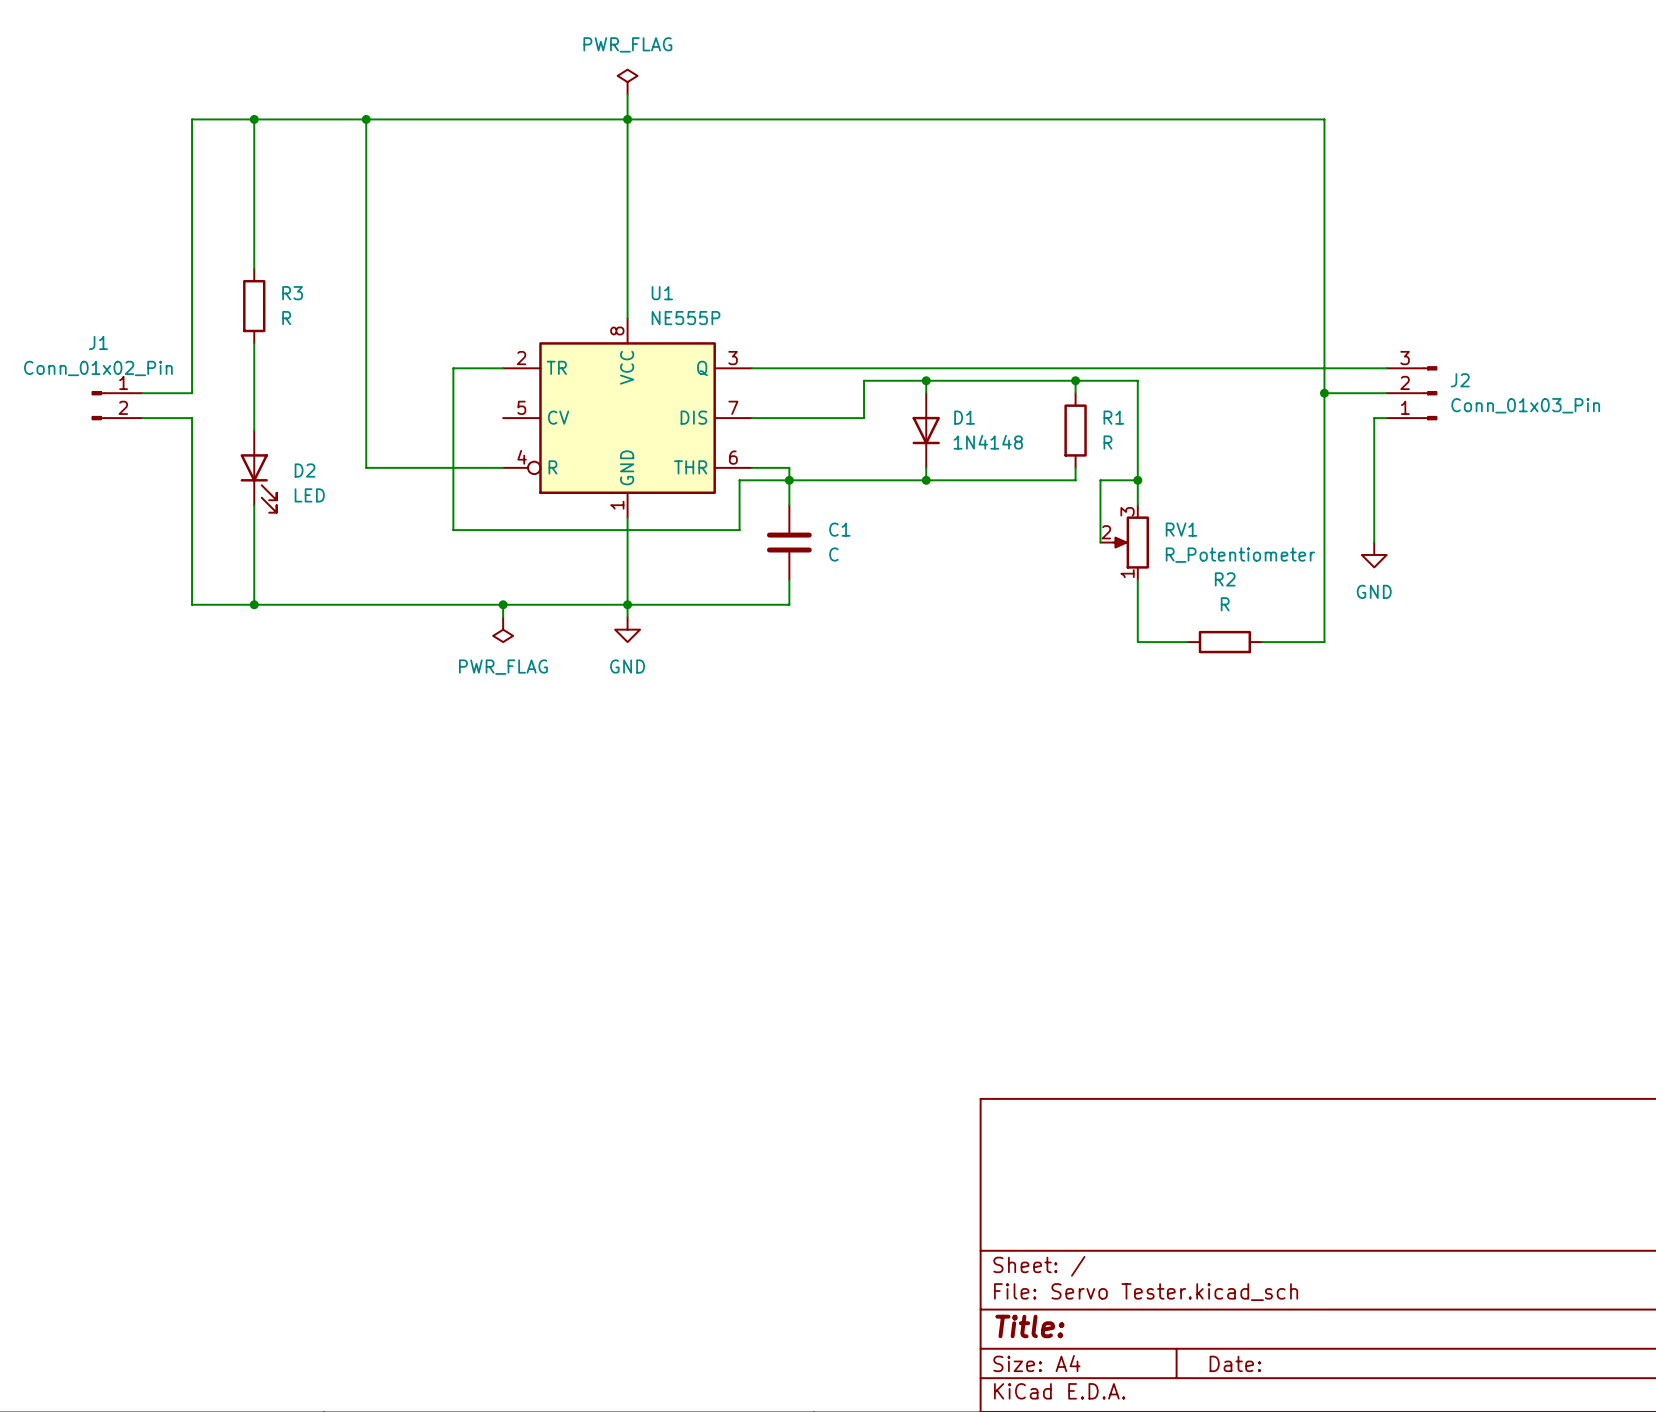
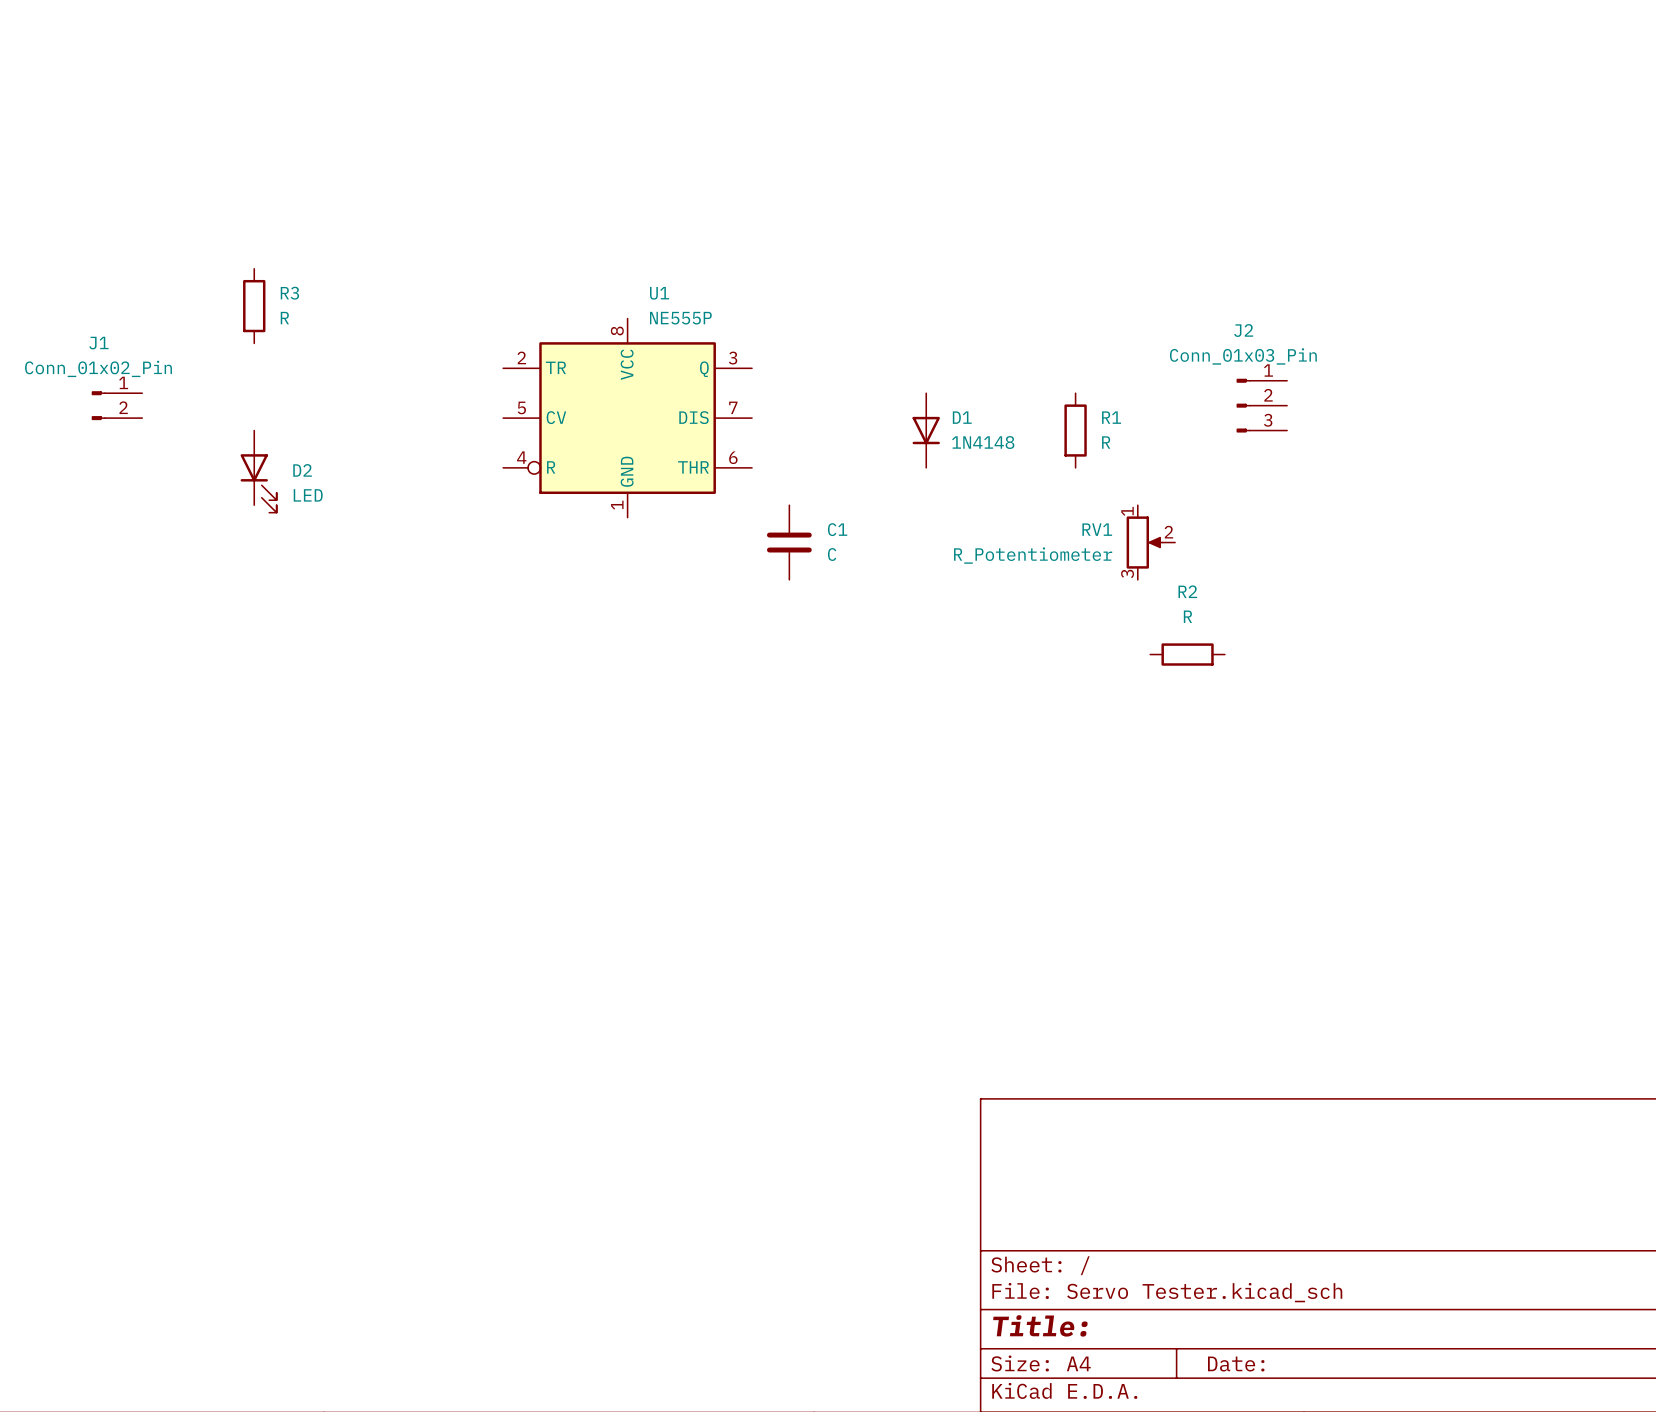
power symbol: PWR_FLAG (627, 82) -> none
wire: (627, 94) (627, 318) -> none
wire: (254, 119) (254, 268) -> none
junction: (254, 119) -> none
wire: (366, 119) (366, 467) (503, 467) -> none
junction: (366, 119) -> none
junction: (627, 119) -> none
wire: (254, 343) (254, 430) -> none
wire: (503, 368) (453, 368) (453, 530) (739, 530) (739, 480) (1075, 480) (1075, 467) -> none
wire: (752, 368) (1386, 368) -> none
wire: (926, 380) (926, 393) -> none
junction: (926, 380) -> none
wire: (1075, 380) (1075, 393) -> none
junction: (1075, 380) -> none
J2 name position: J2 (1460, 380) -> J2 (1243, 330)
wire: (142, 393) (192, 393) (192, 119) (1324, 119) (1324, 642) (1262, 642) -> none
wire: (1324, 393) (1386, 393) -> none
junction: (1324, 393) -> none
J2 position: (1411, 393) -> (1261, 405)
J2 rotation: 0° (1430, 393) -> 180° (1243, 405)
J2 value position: Conn_01x03_Pin (1525, 405) -> Conn_01x03_Pin (1243, 356)
wire: (142, 418) (192, 418) (192, 604) (789, 604) (789, 579) -> none
wire: (752, 418) (864, 418) (864, 380) (1137, 380) (1137, 505) -> none
wire: (1386, 418) (1374, 418) (1374, 542) -> none
wire: (752, 467) (789, 467) (789, 505) -> none
wire: (926, 467) (926, 480) -> none
junction: (789, 480) -> none
junction: (926, 480) -> none
wire: (1137, 480) (1100, 480) (1100, 542) -> none
junction: (1137, 480) -> none
wire: (254, 505) (254, 604) -> none
wire: (627, 517) (627, 617) -> none
RV1 name position: RV1 (1181, 529) -> RV1 (1097, 529)
RV1 rotation: 0° (1130, 542) -> 180° (1144, 542)
power symbol: GND (1374, 554) -> none
RV1 value position: R_Potentiometer (1240, 555) -> R_Potentiometer (1033, 555)
wire: (1137, 579) (1137, 642) (1187, 642) -> none
junction: (254, 604) -> none
wire: (503, 604) (503, 617) -> none
junction: (503, 604) -> none
junction: (627, 604) -> none
power symbol: PWR_FLAG (503, 629) -> none
power symbol: GND (627, 629) -> none
R2 position: (1224, 642) -> (1187, 654)

